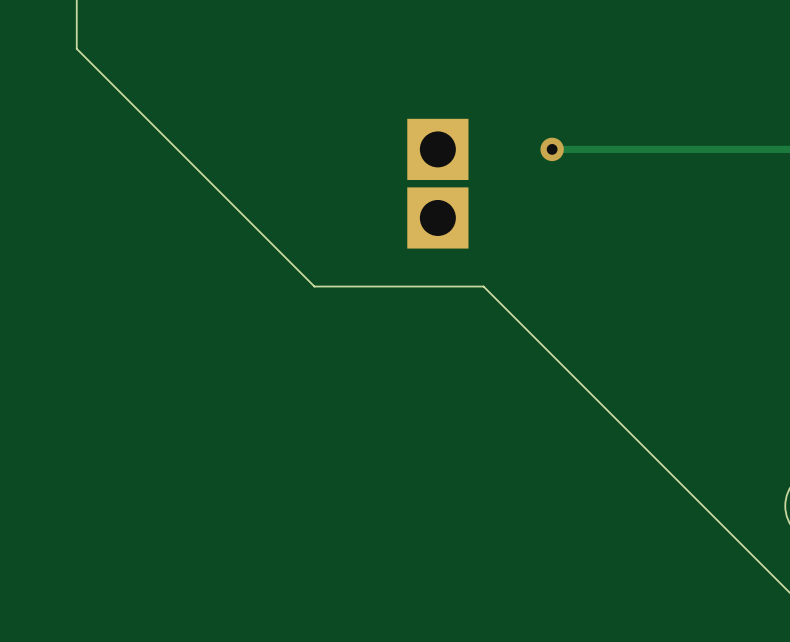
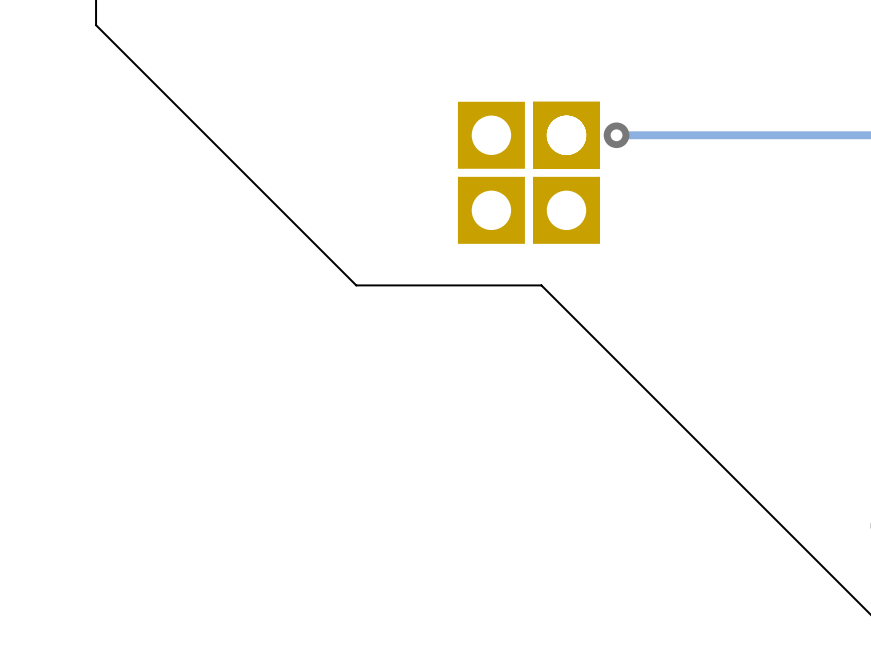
part: none -> (566, 135)
part: none -> (566, 210)

